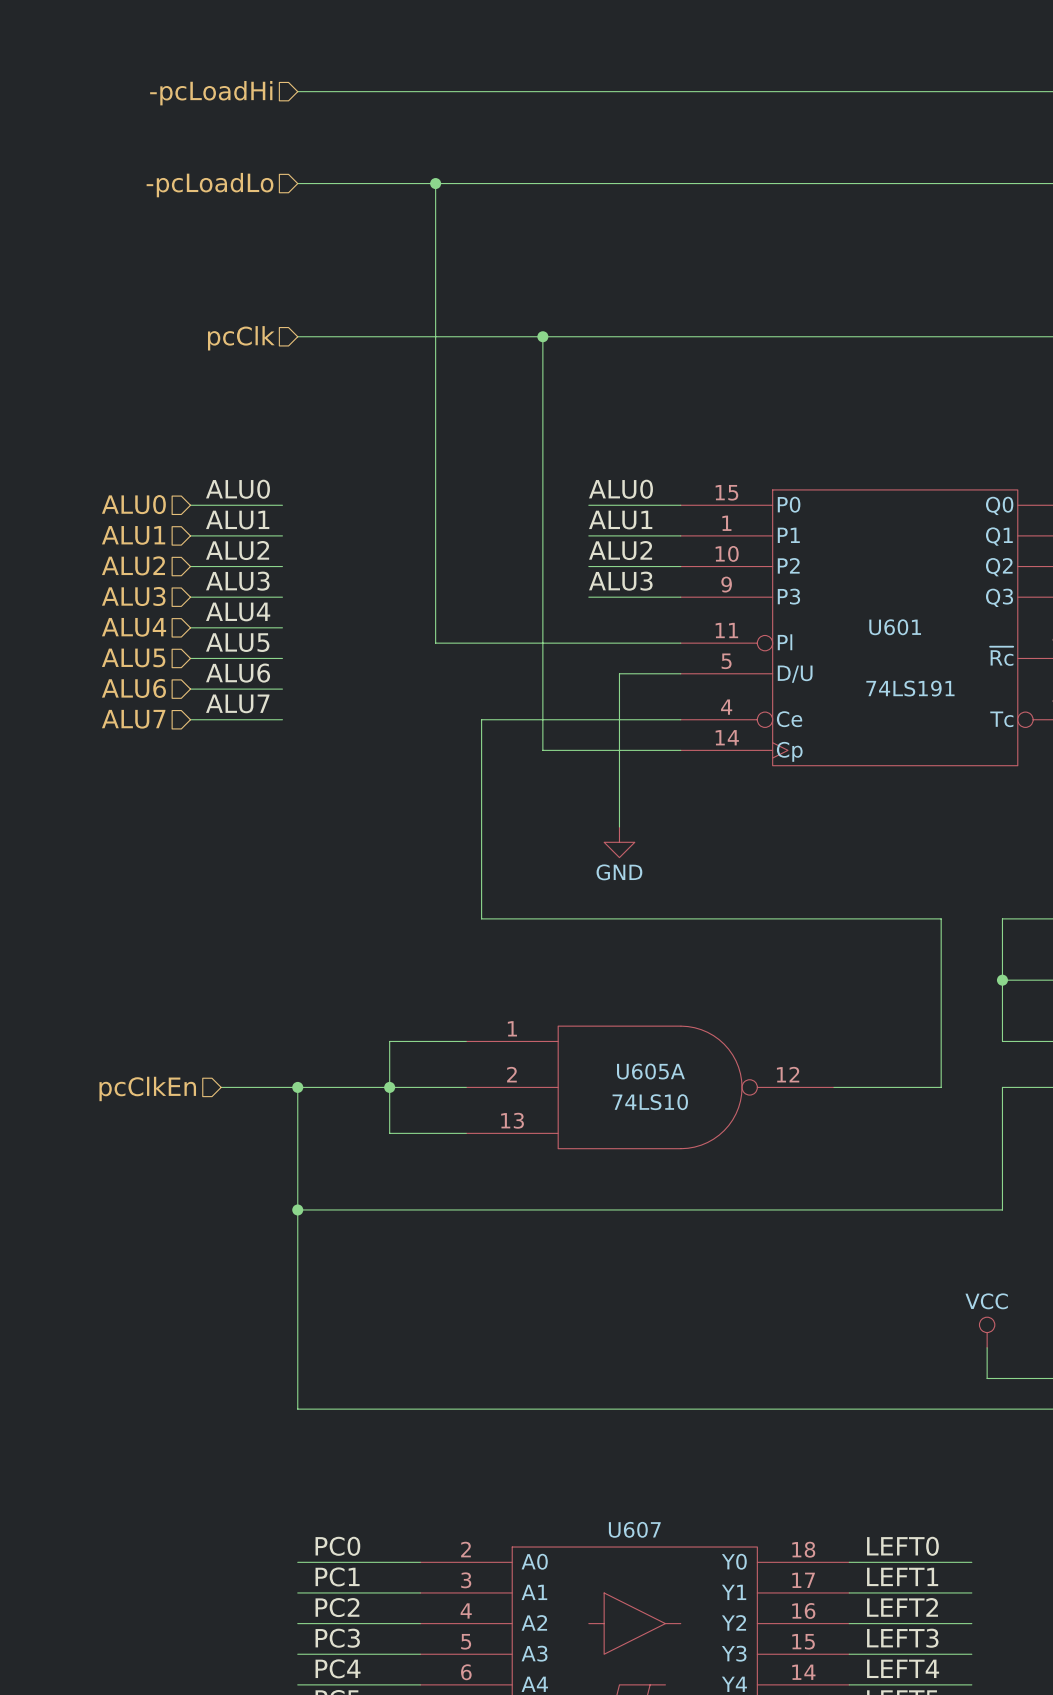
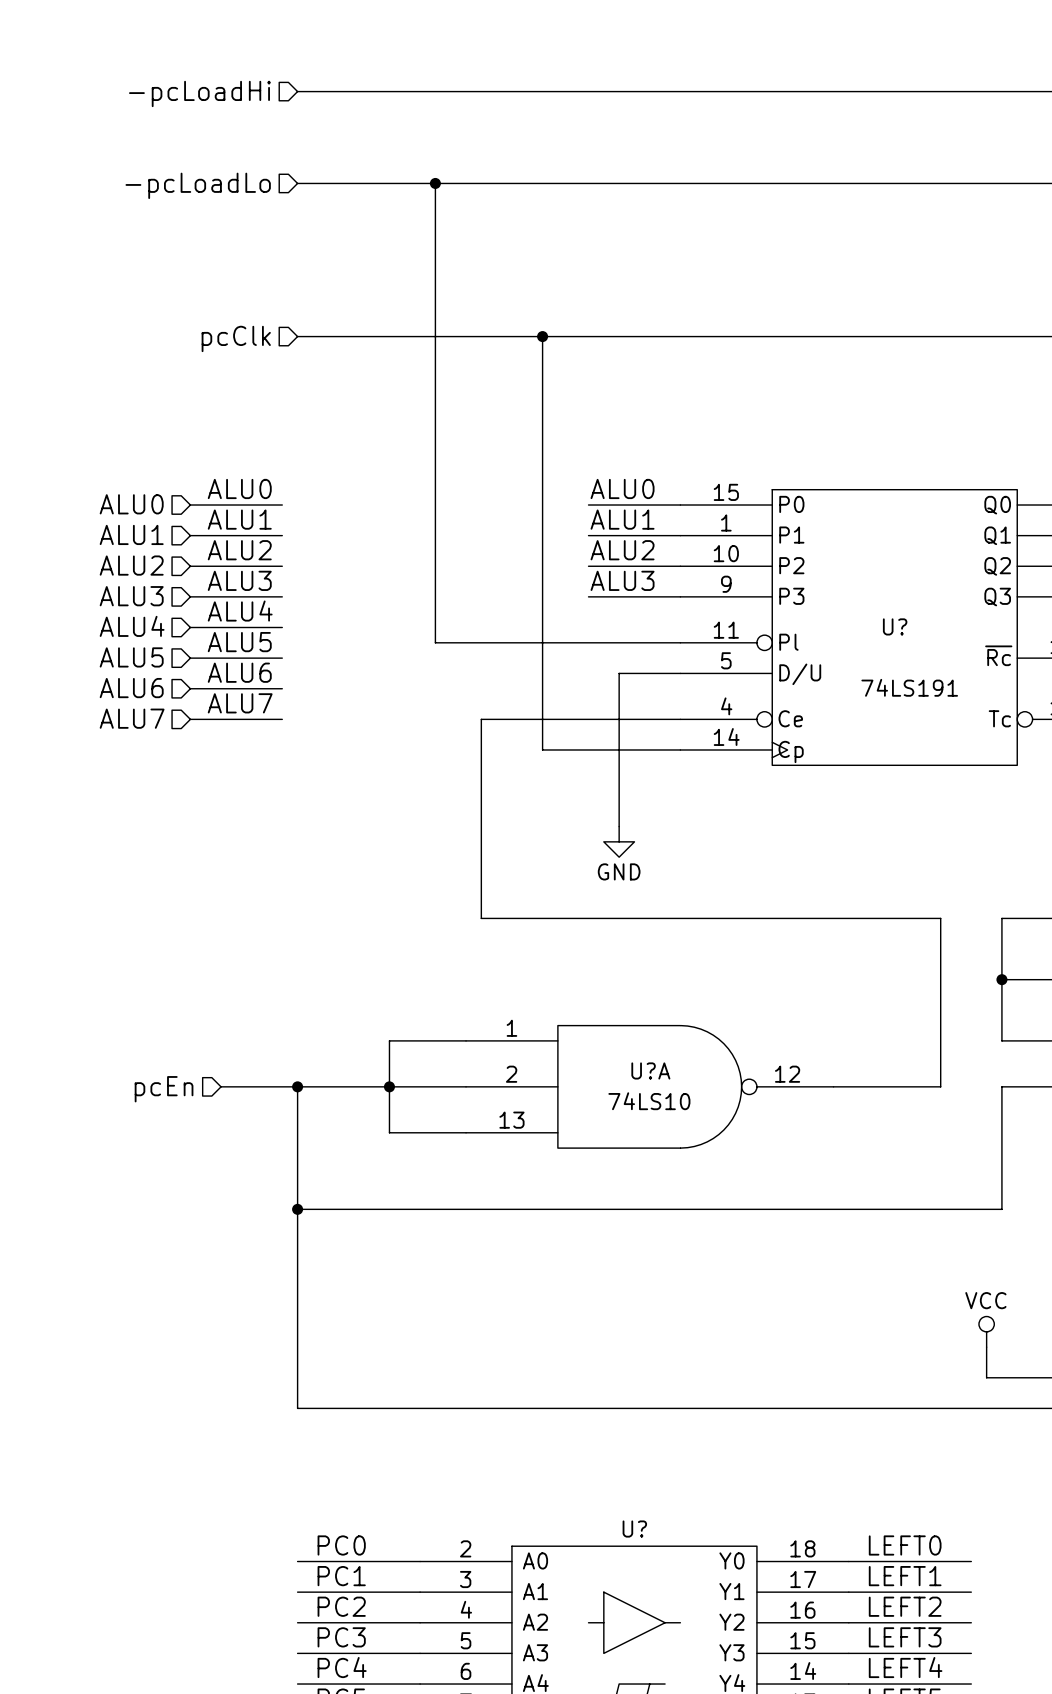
U601 name: U601 (895, 627) -> U? (895, 626)
U605A name: U605A (650, 1071) -> U?A (650, 1070)
hierarchical label: pcClkEn (147, 1088) -> pcEn (164, 1089)
U607 name: U607 (634, 1529) -> U? (634, 1529)

